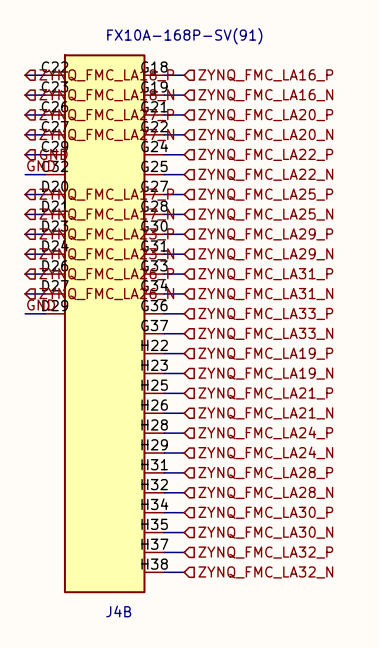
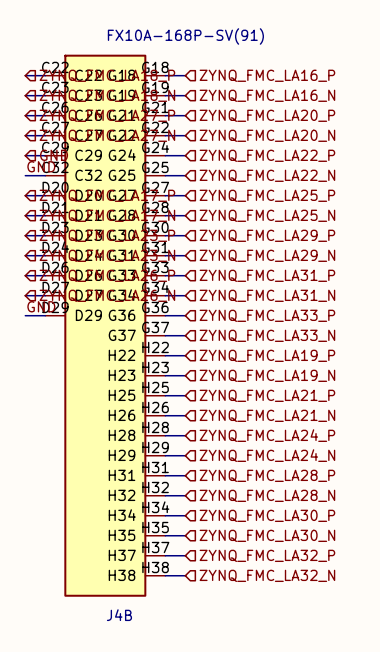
J4B symbol: [45, 54, 165, 594] -> [45, 54, 166, 597]

